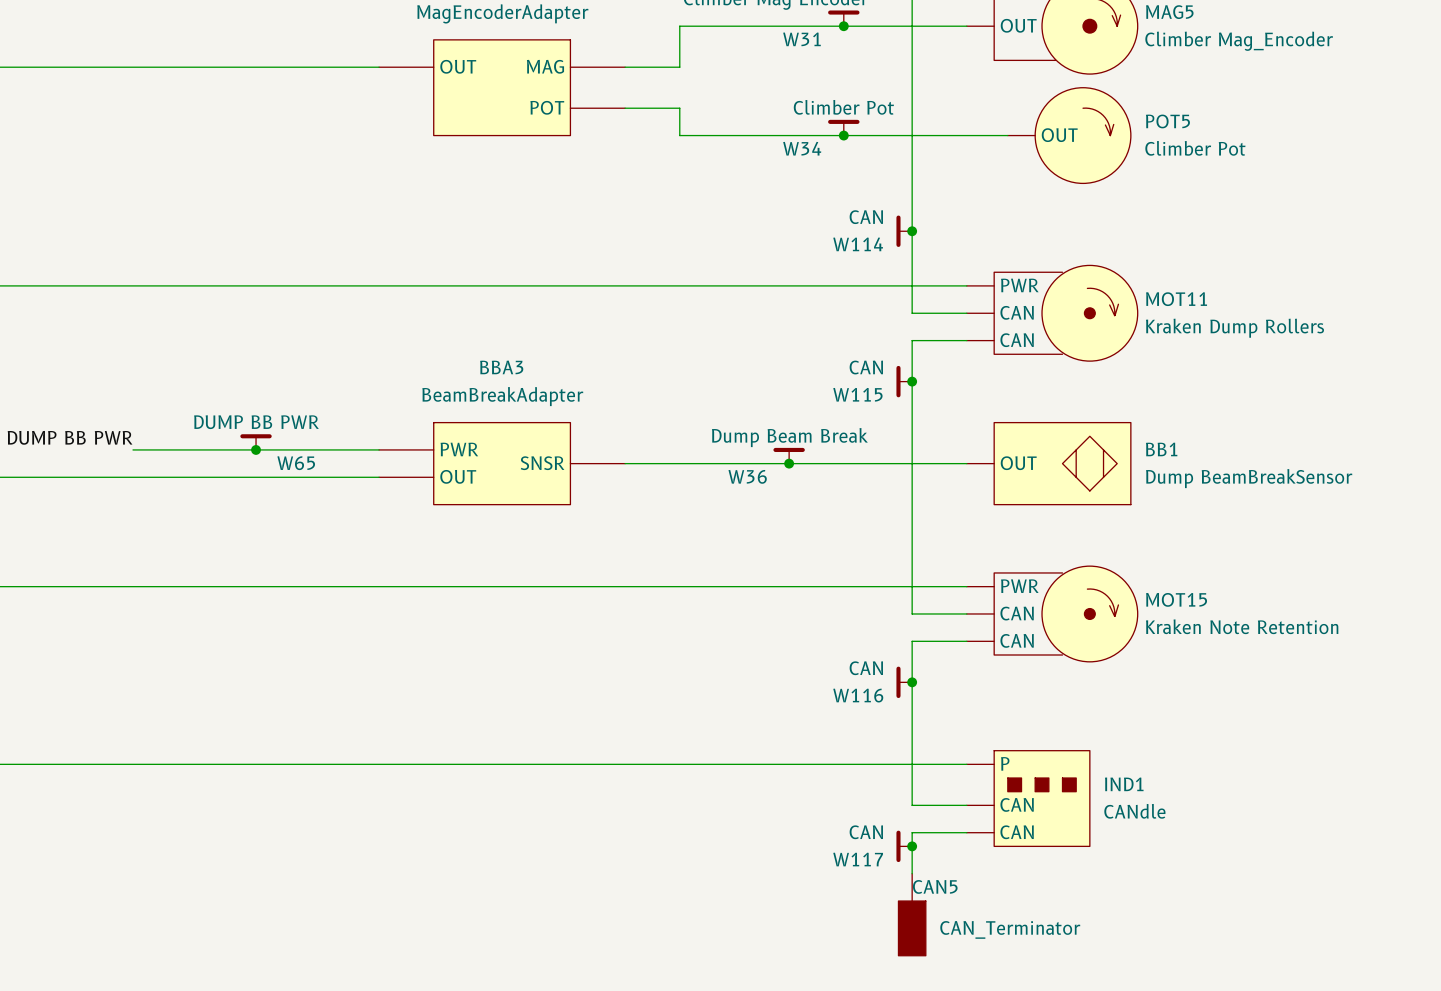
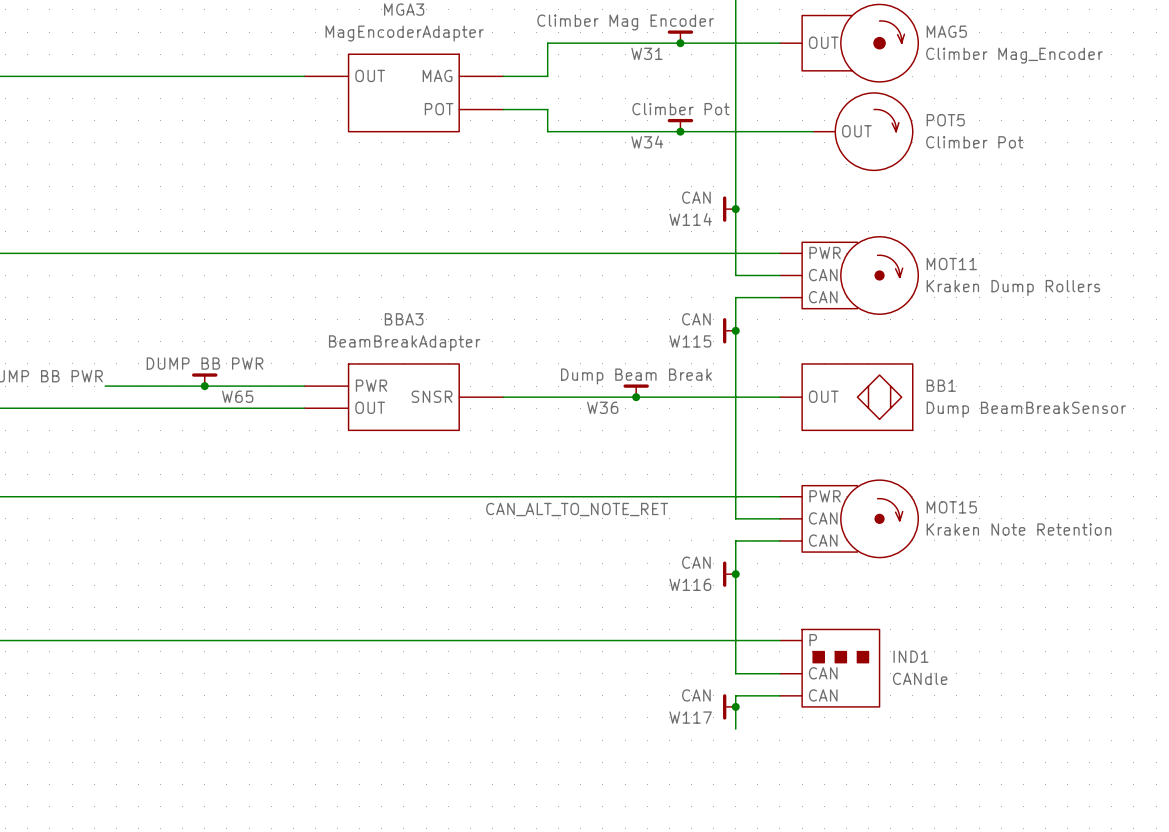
label: none -> CAN_ALT_TO_NOTE_RET (577, 509)
CAN5: CAN_Terminator (912, 914) -> none

